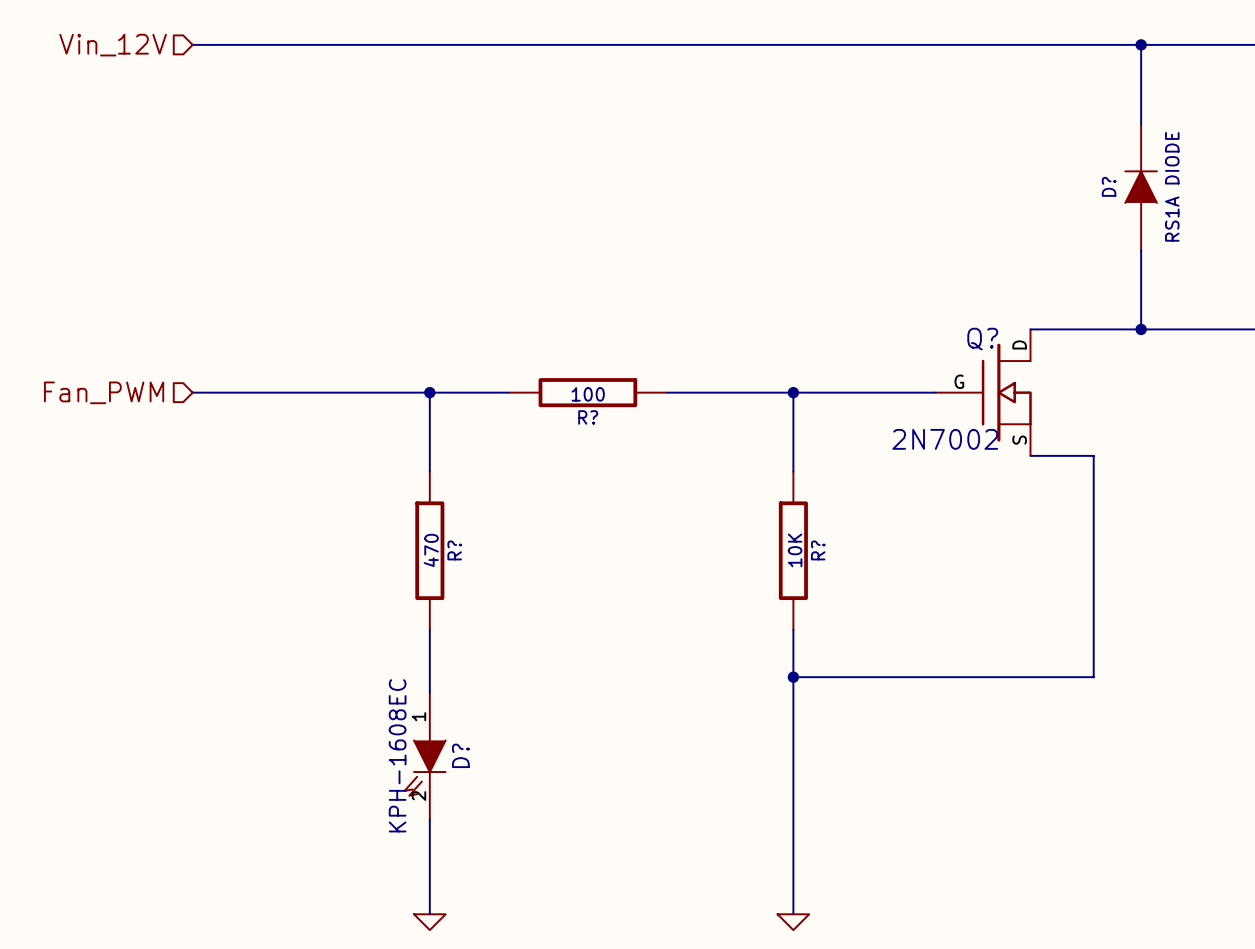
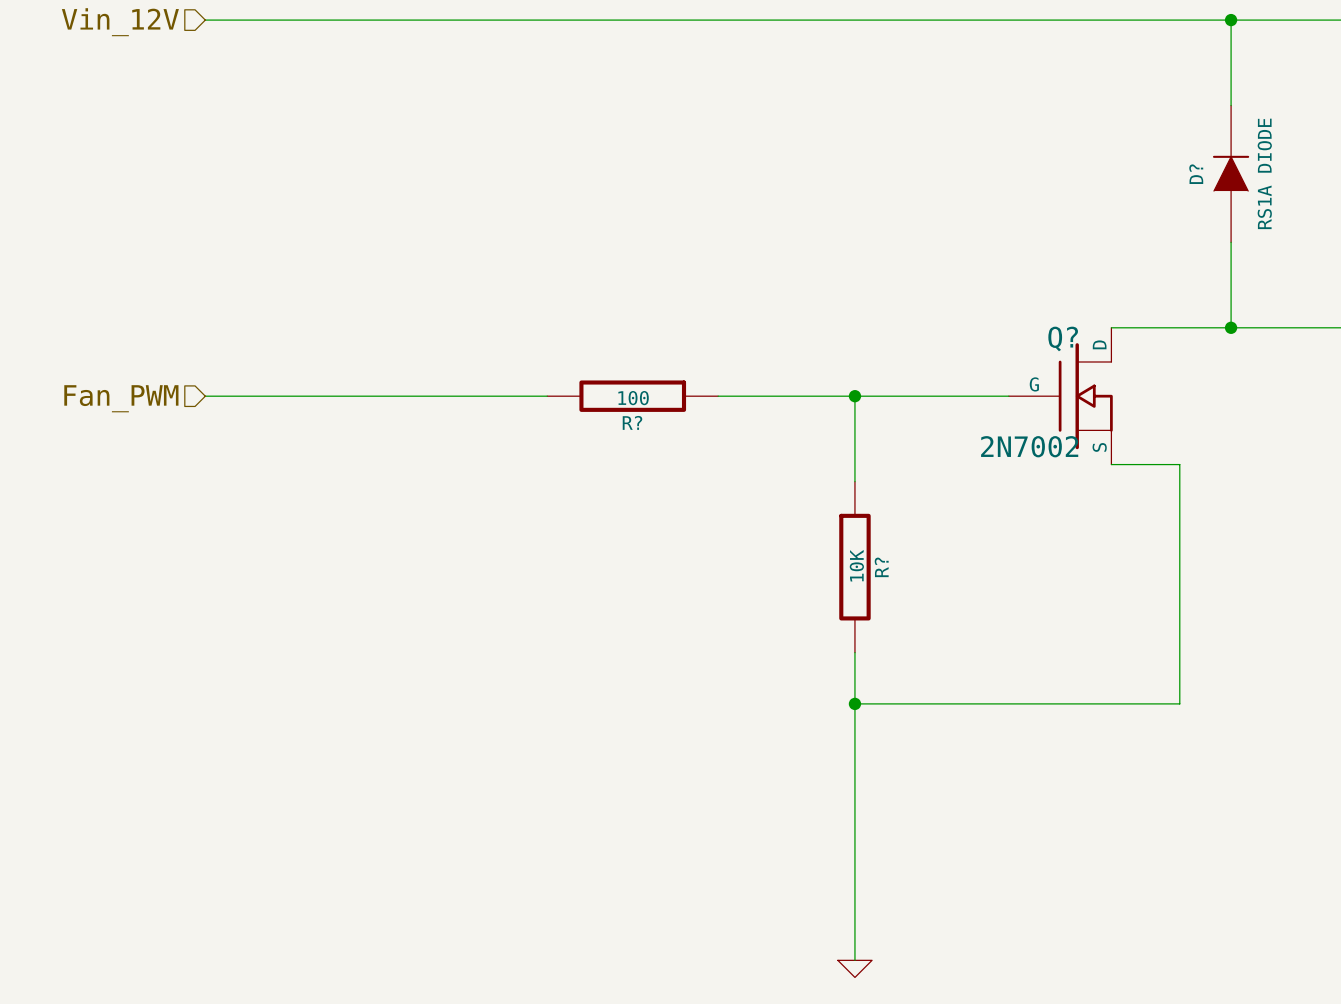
wire: (429, 392) (429, 471) -> none
junction: (429, 392) -> none
R?: 470 (429, 550) -> none
wire: (429, 629) (429, 692) -> none
D?: KPH-1608EC (425, 756) -> none
wire: (429, 819) (429, 914) -> none
power symbol: (429, 922) -> none

